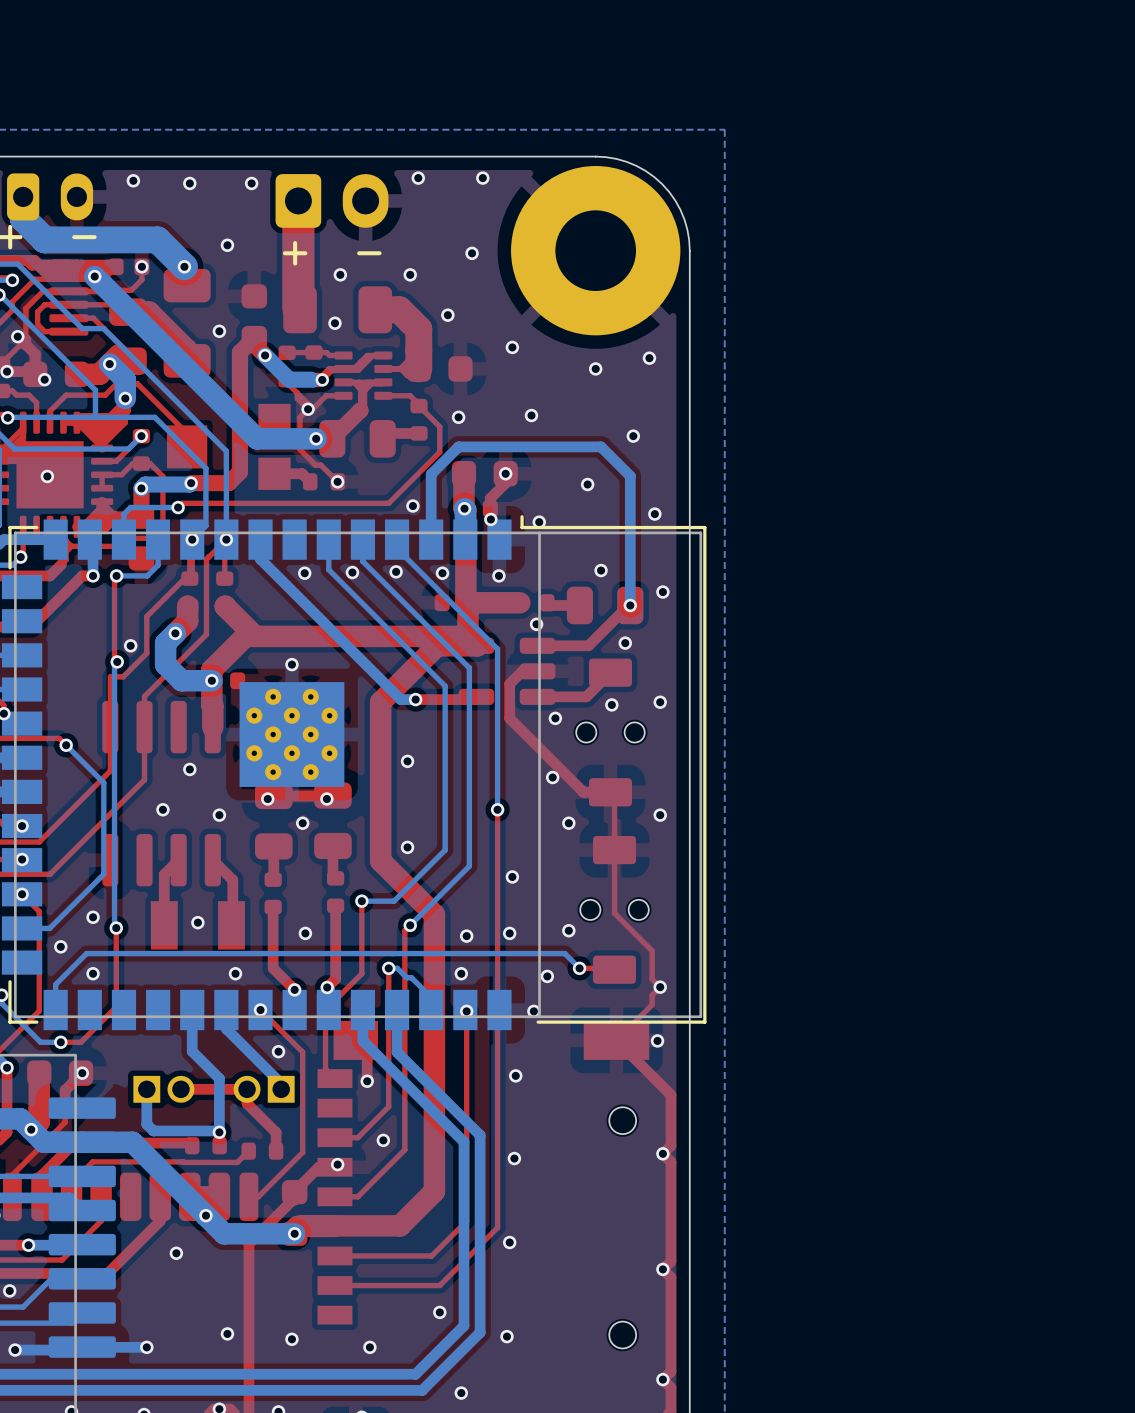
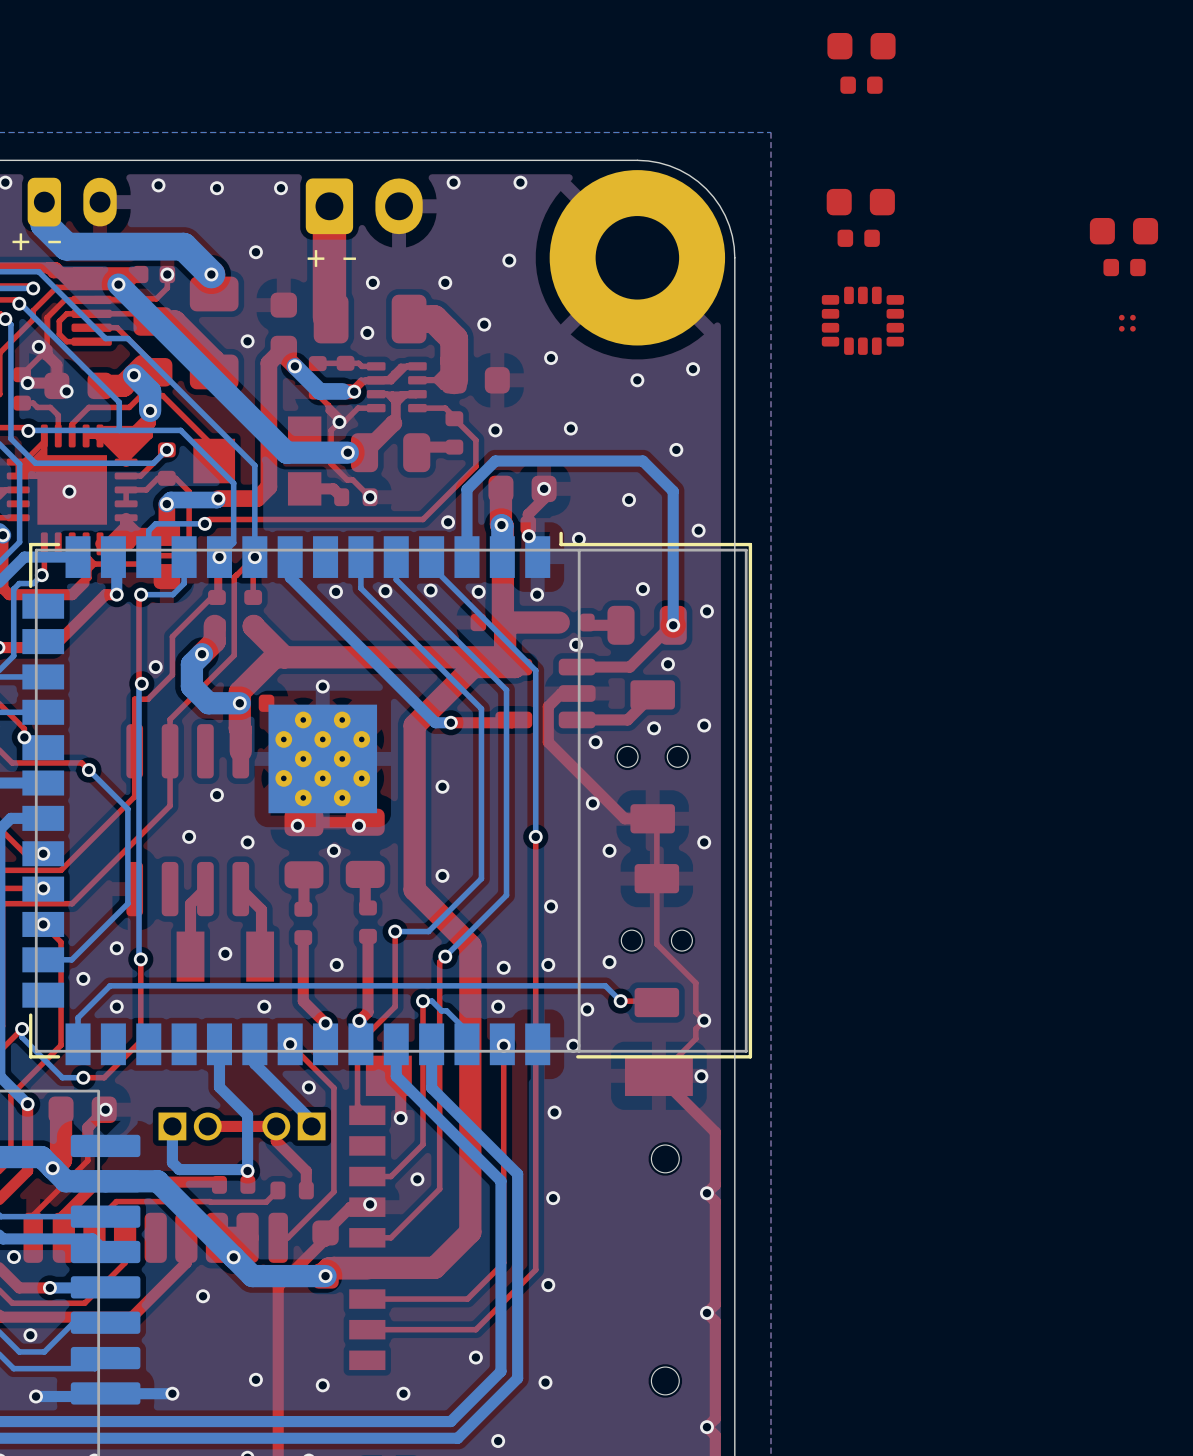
part: none -> (861, 46)
part: none -> (861, 85)
part: none -> (860, 202)
part: none -> (1123, 231)
part: none -> (858, 238)
part: none -> (1124, 267)
part: none -> (862, 320)
part: none -> (1127, 323)

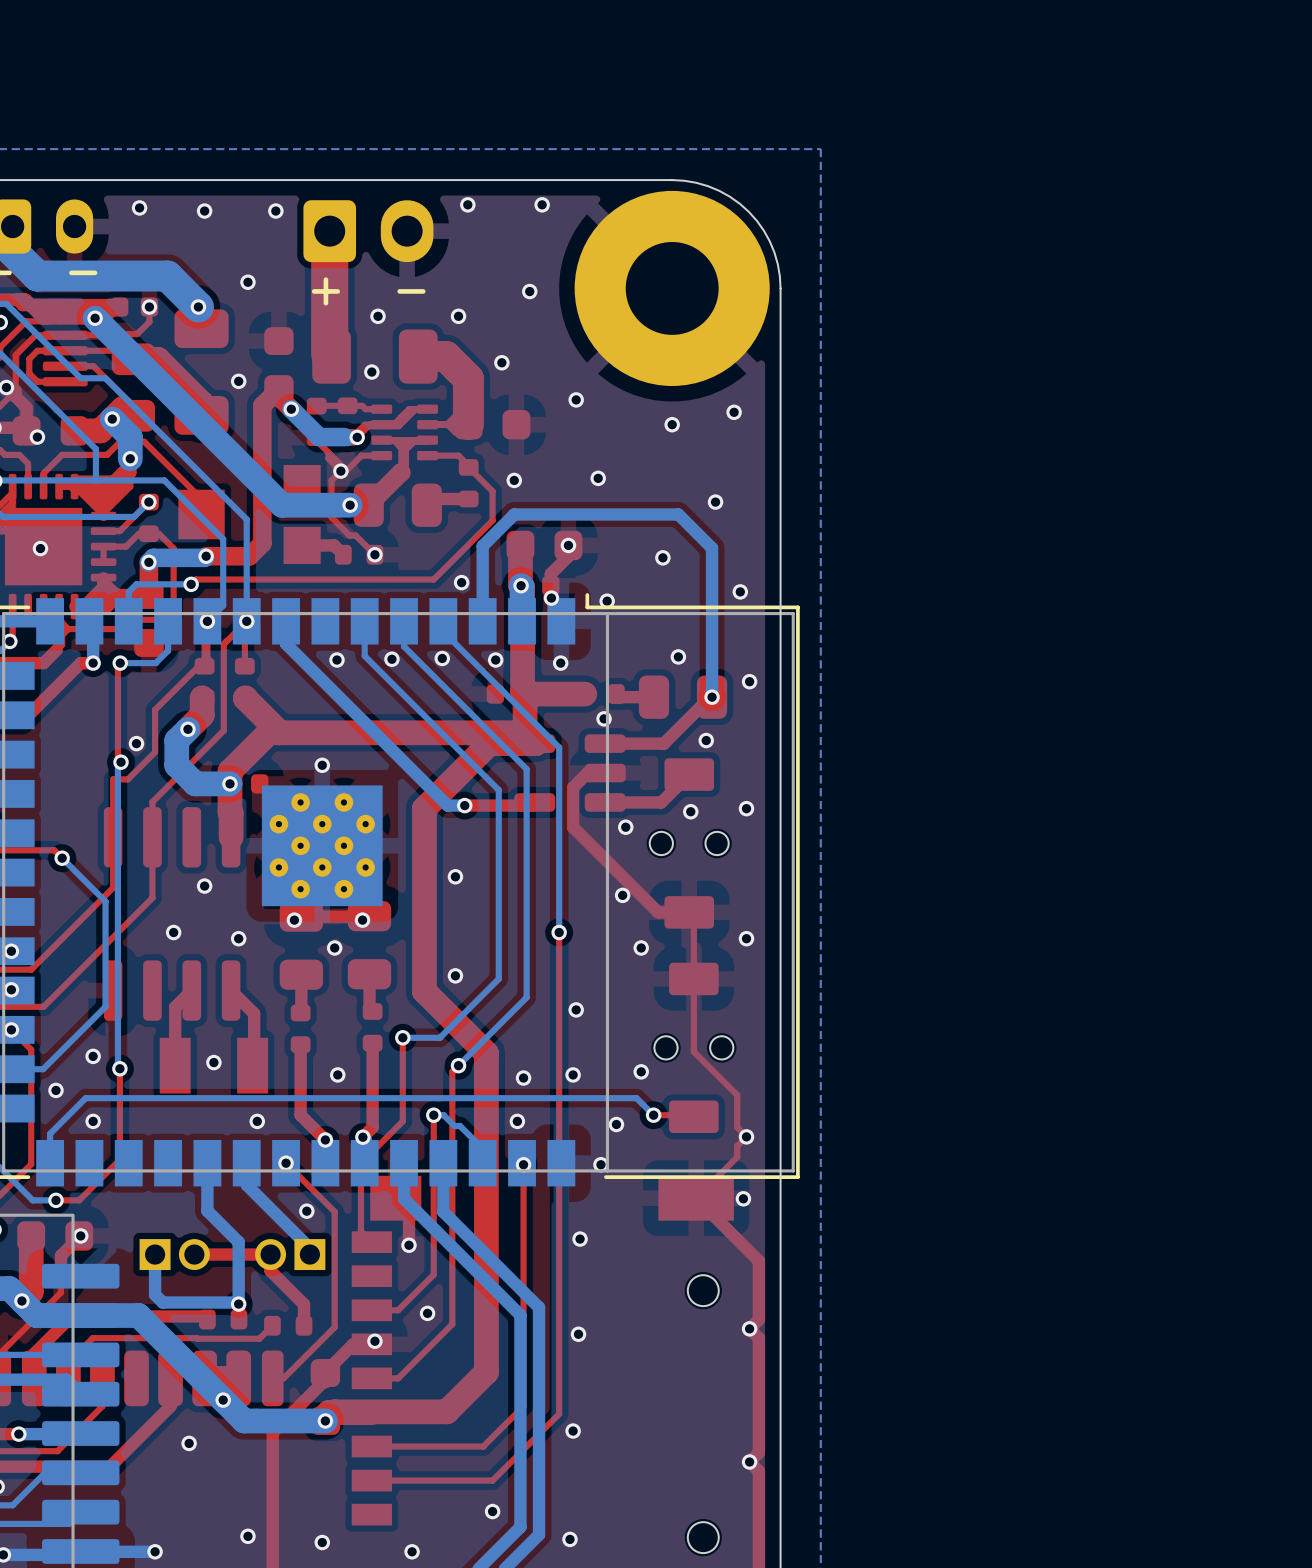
part: (861, 46) -> none
part: (861, 85) -> none
part: (860, 202) -> none
part: (1123, 231) -> none
part: (858, 238) -> none
part: (1124, 267) -> none
part: (862, 320) -> none
part: (1127, 323) -> none

